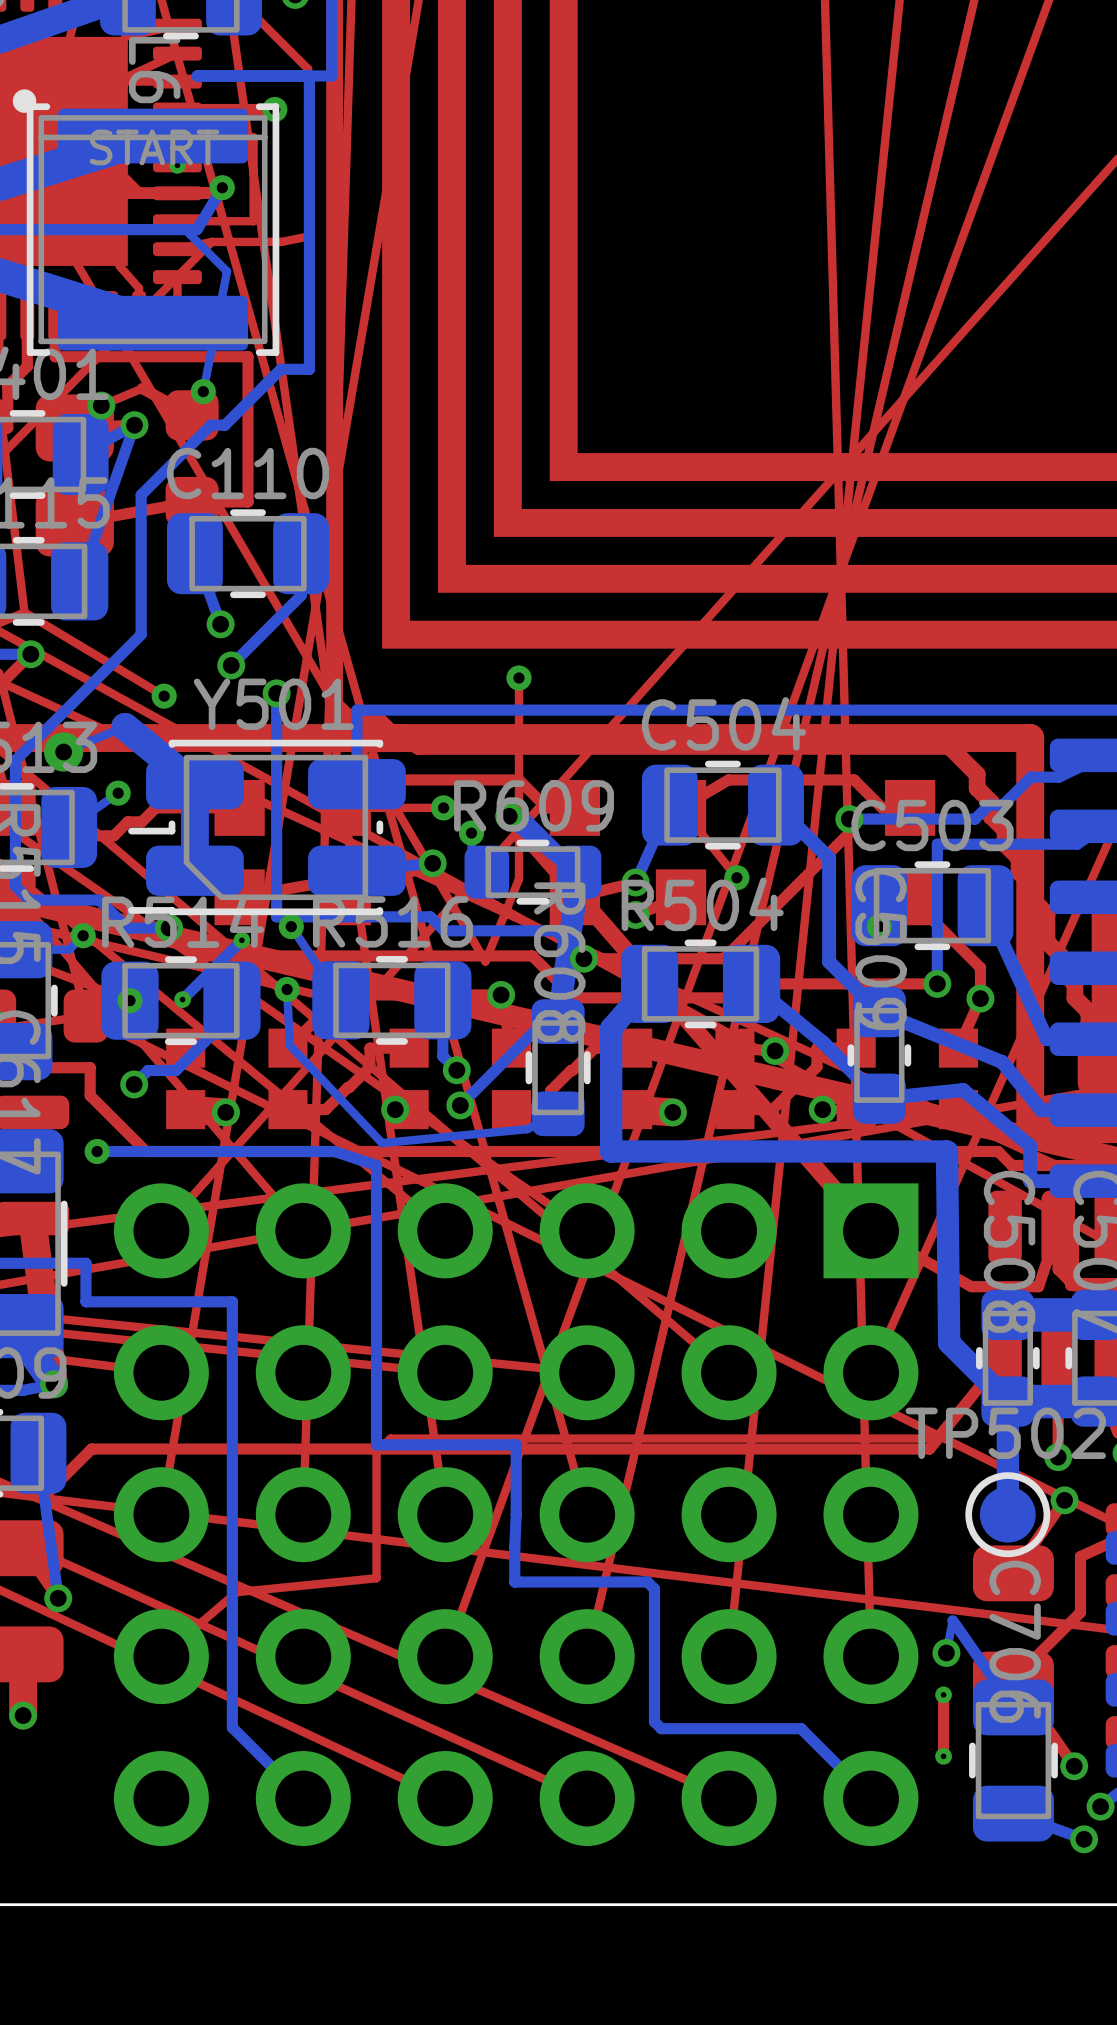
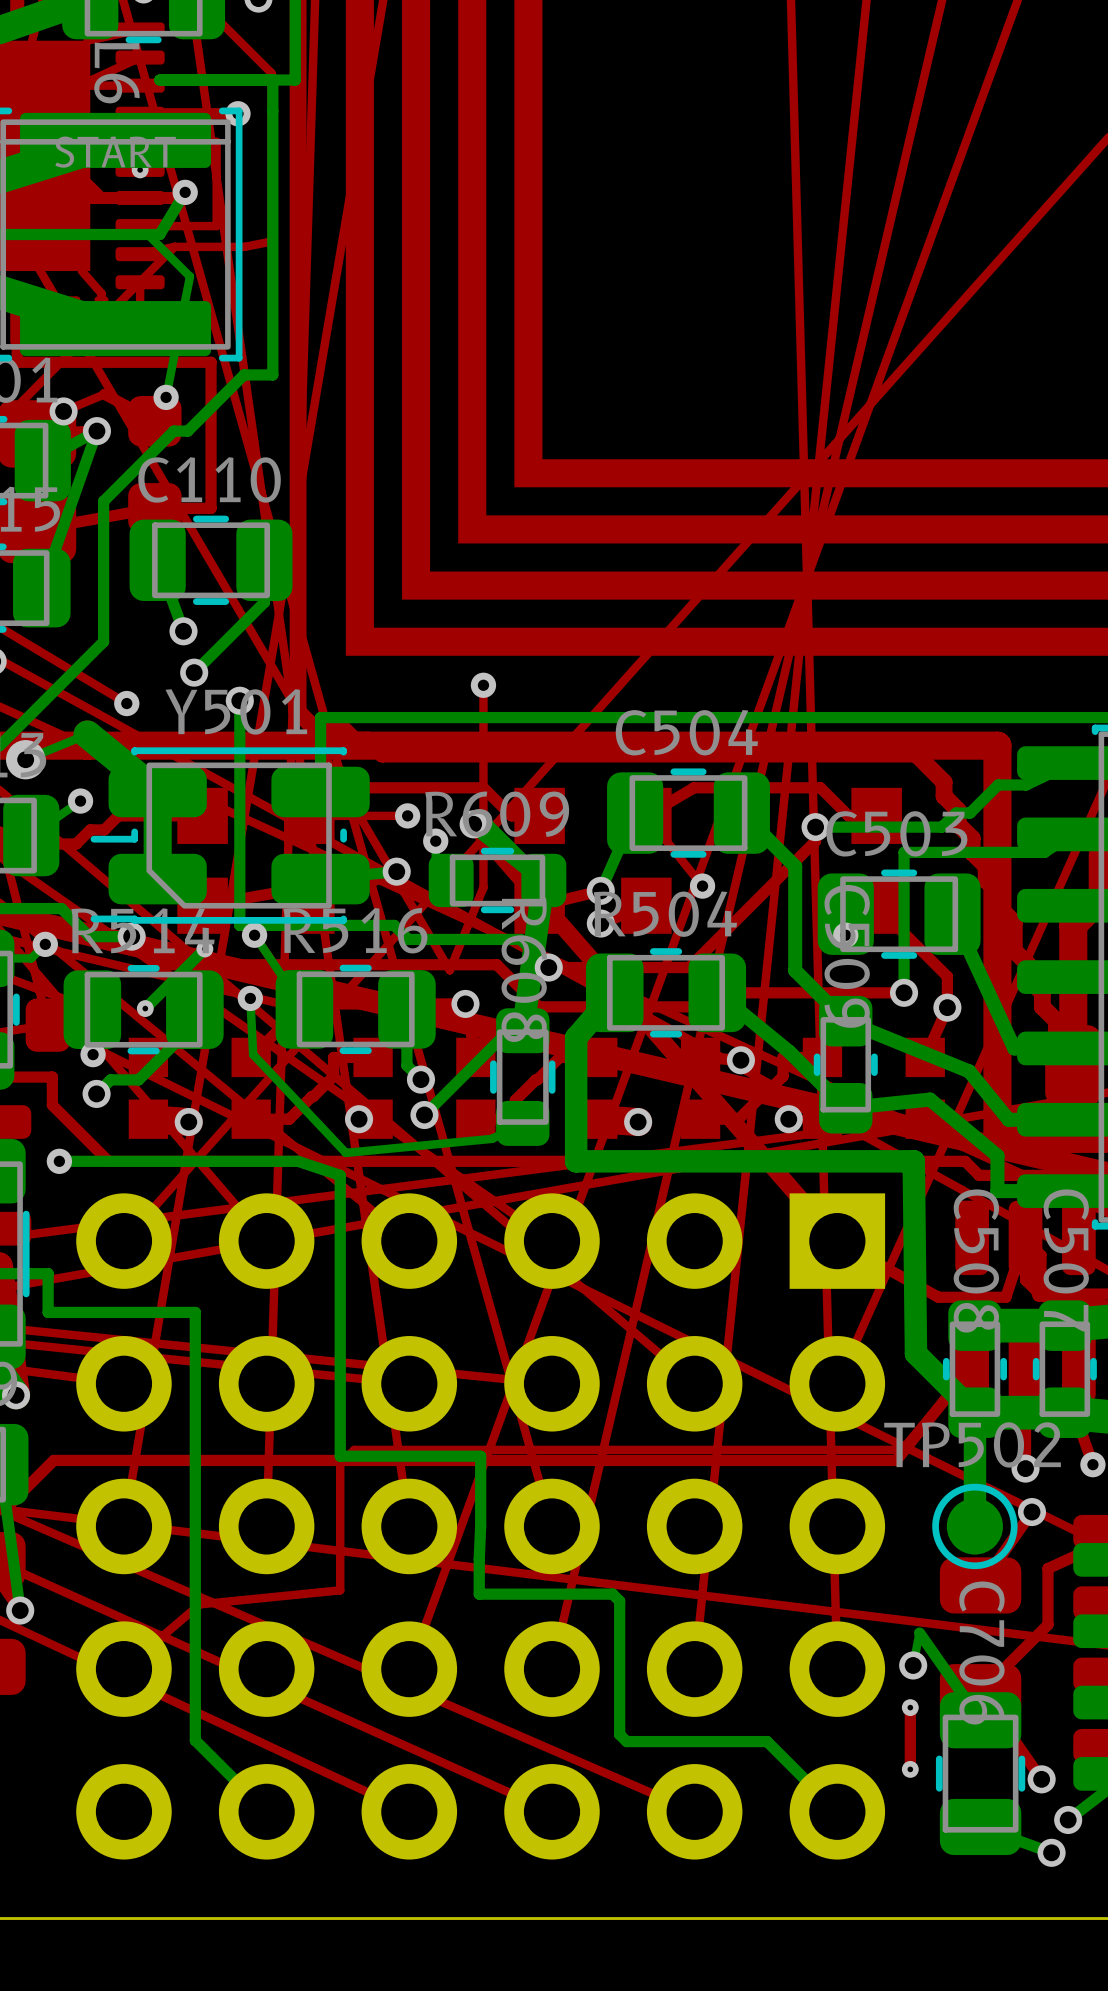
via position: (129, 1000) -> (93, 1054)

